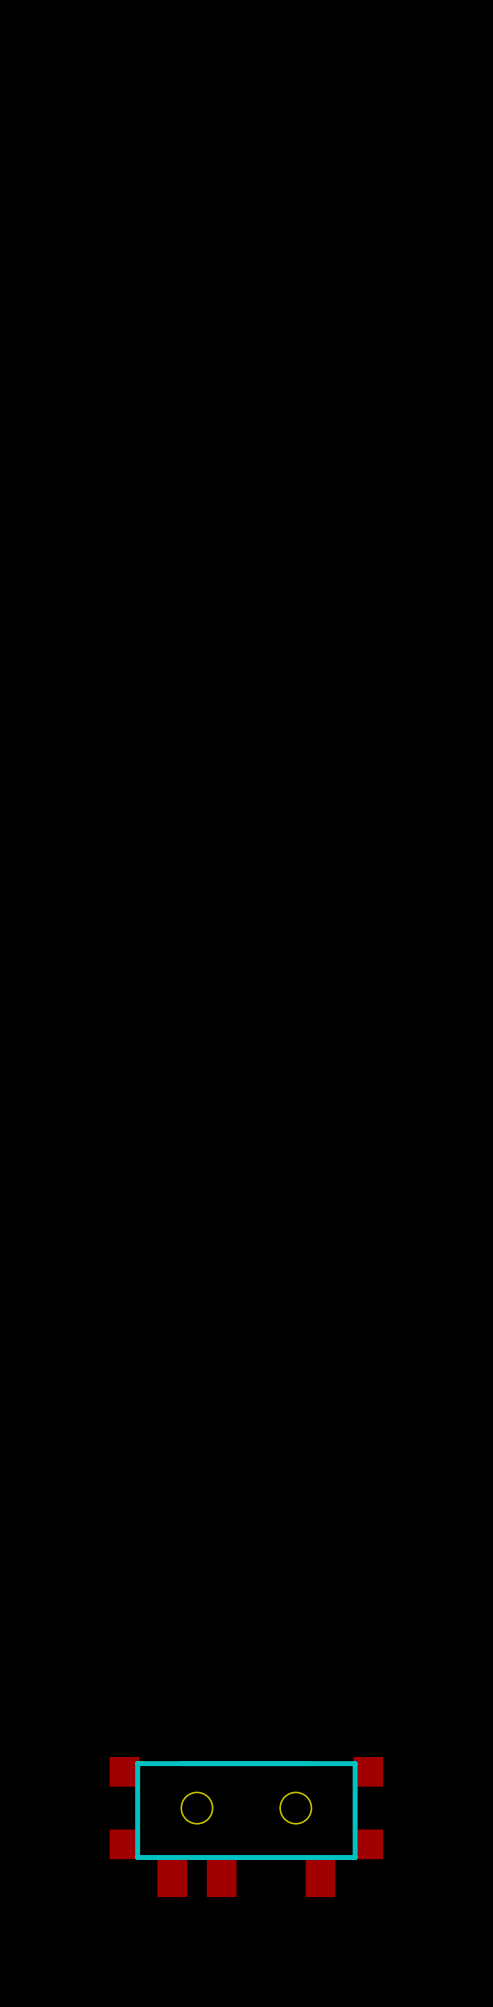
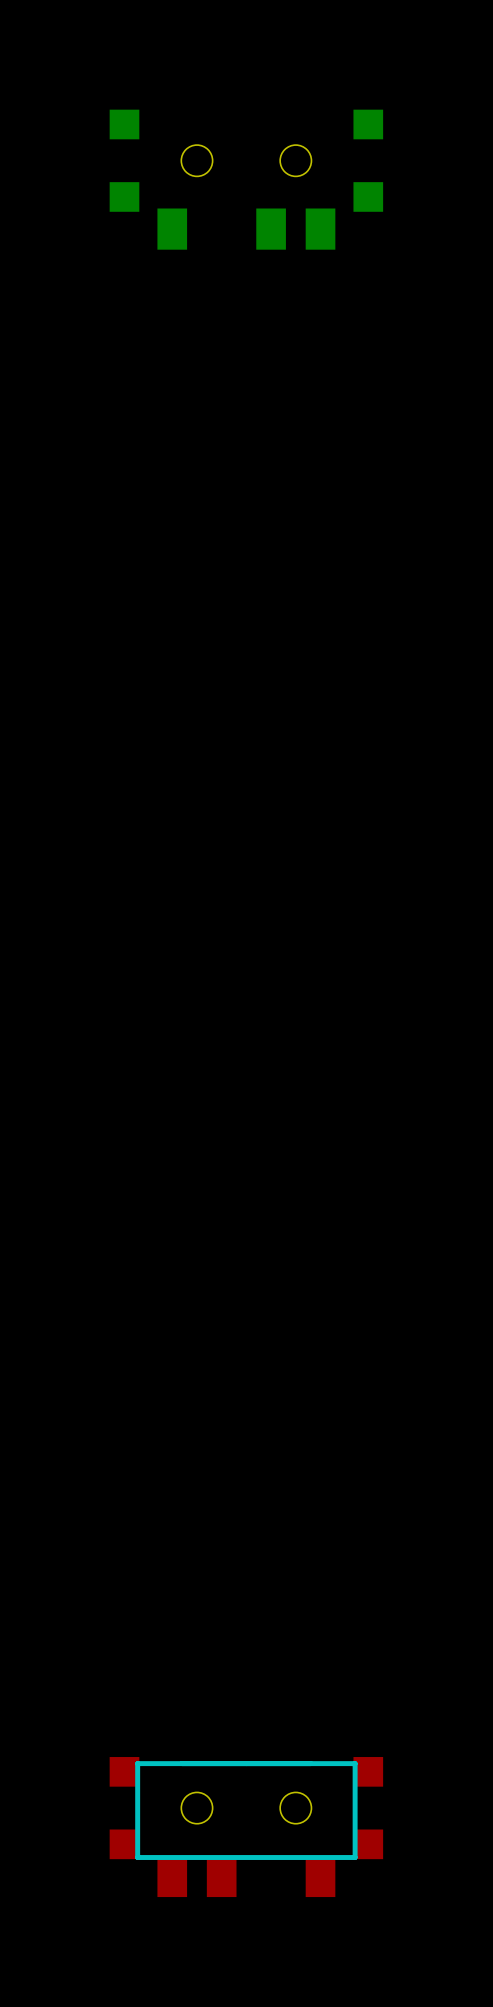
part: none -> (246, 179)

